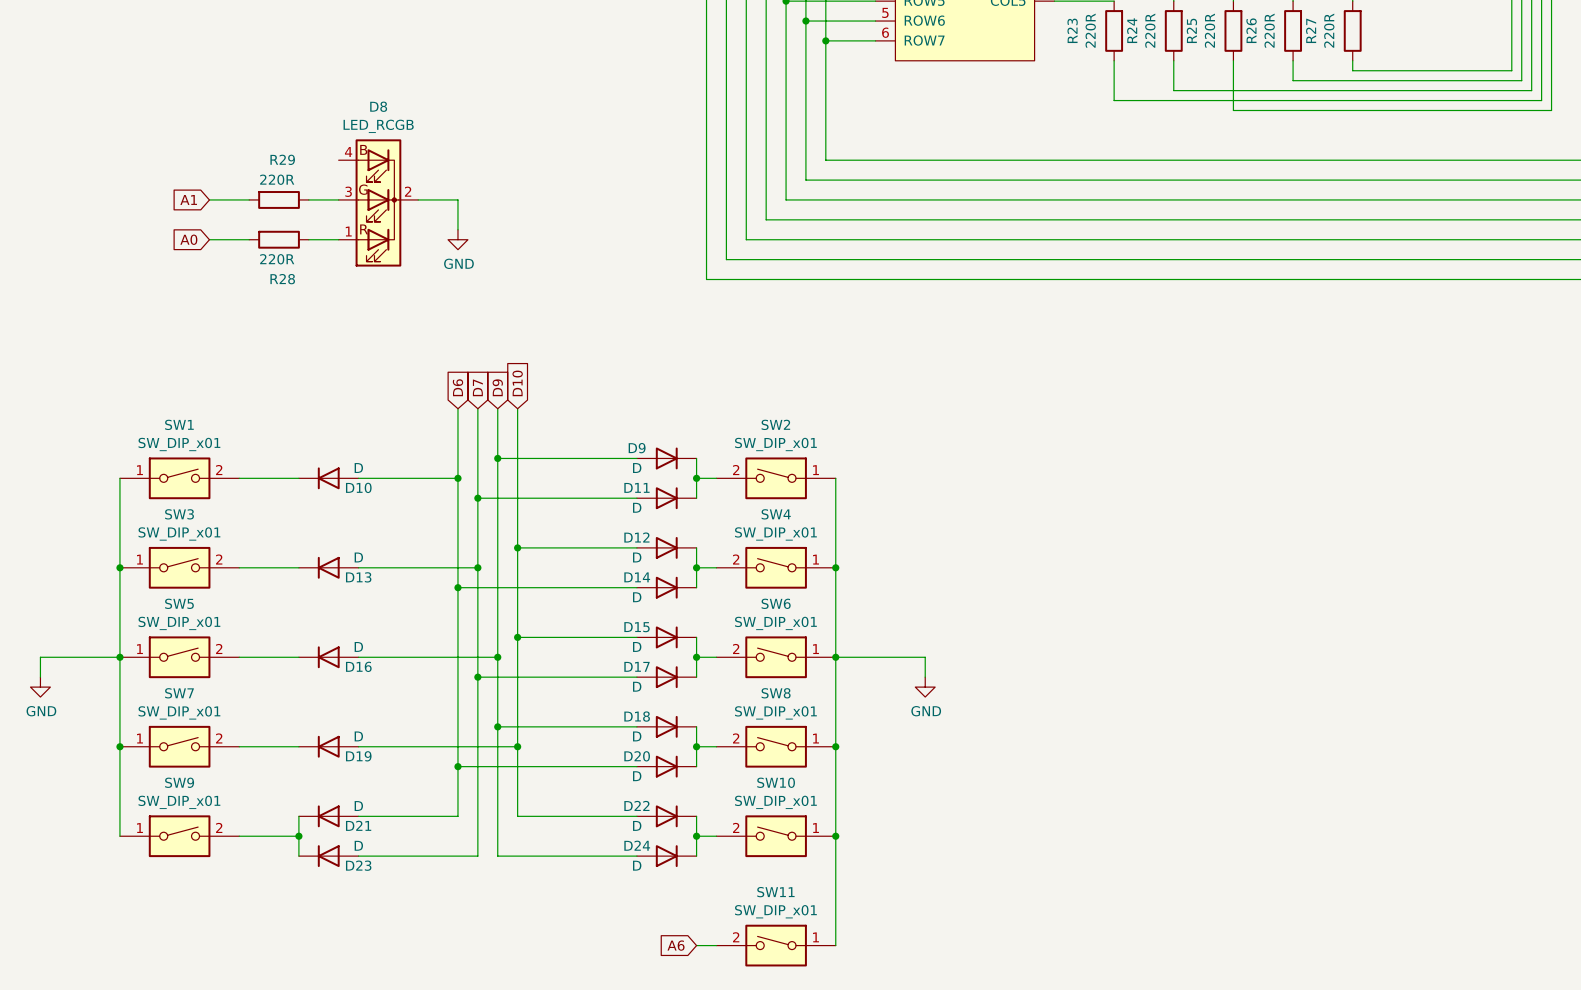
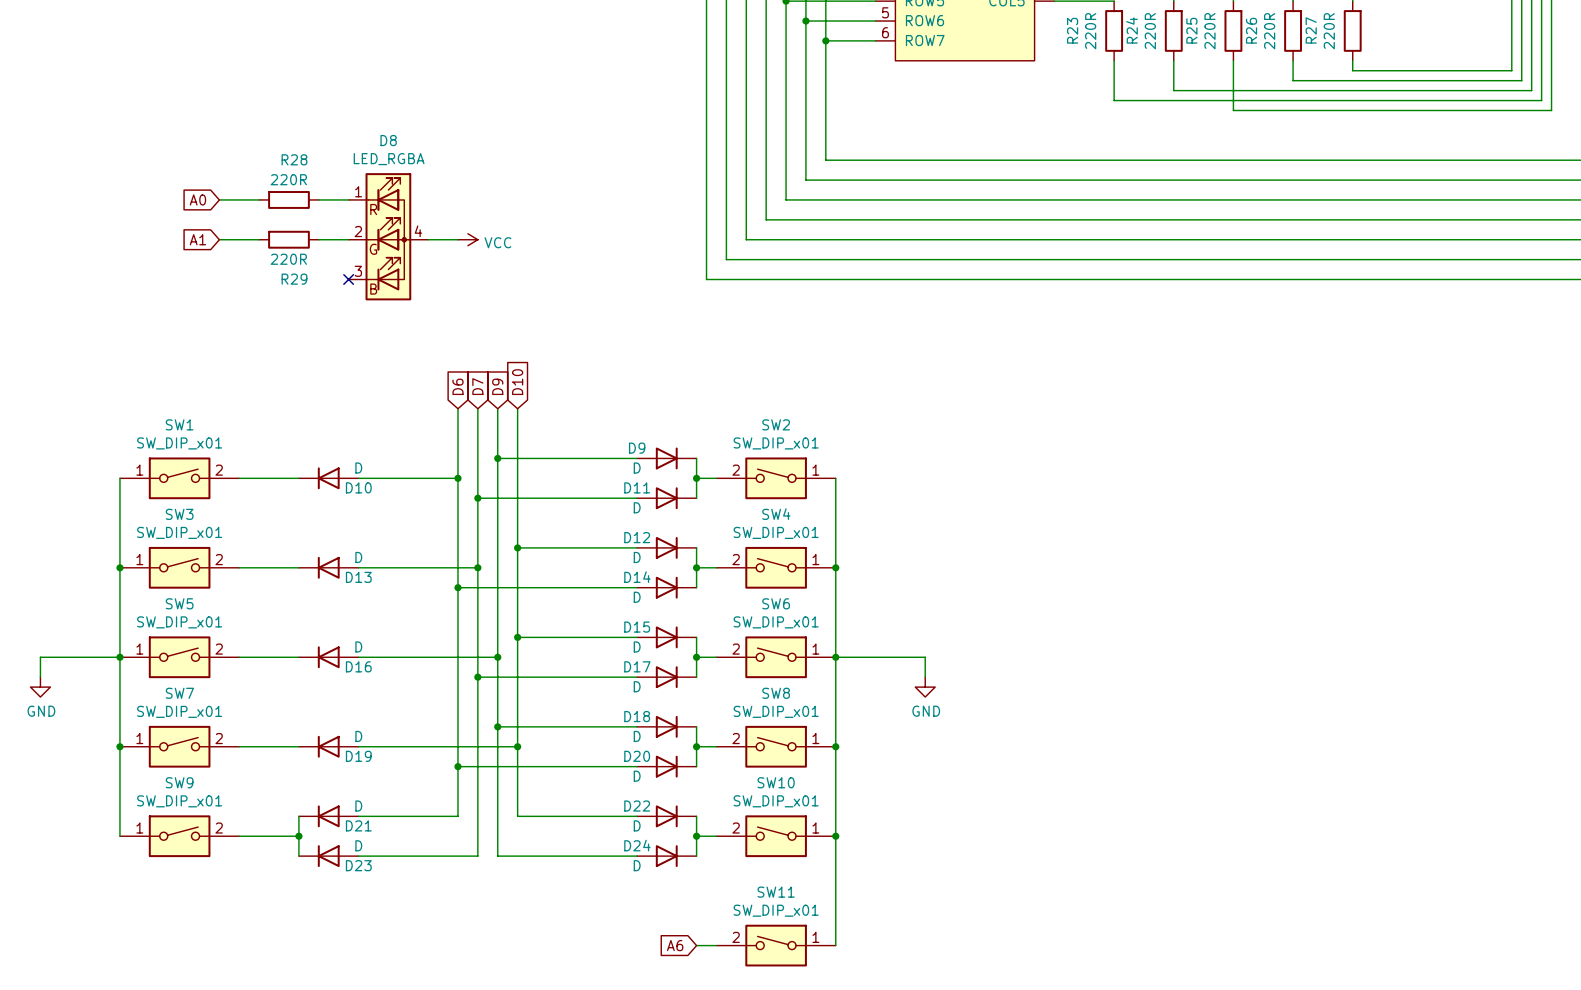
D8 value: LED_RCGB (378, 126) -> LED_RGBA (389, 159)
D8 symbol: [338, 139, 419, 267] -> [348, 173, 429, 301]
R29 name position: R29 (282, 159) -> R29 (294, 279)
R29 value position: 220R (277, 179) -> 220R (288, 259)
global label position: A1 (188, 199) -> A1 (197, 239)
R29 position: (279, 199) -> (288, 239)
wire: (418, 199) (457, 199) (457, 229) -> none
global label position: A0 (188, 239) -> A0 (197, 199)
R28 position: (279, 239) -> (288, 199)
wire: none -> (428, 239) (457, 239)
power symbol: GND (457, 239) -> none
power symbol: none -> VCC (467, 239)
R28 value position: 220R (277, 259) -> 220R (288, 179)
R28 name position: R28 (282, 279) -> R28 (294, 159)
no-connect mark: none -> (348, 279)

